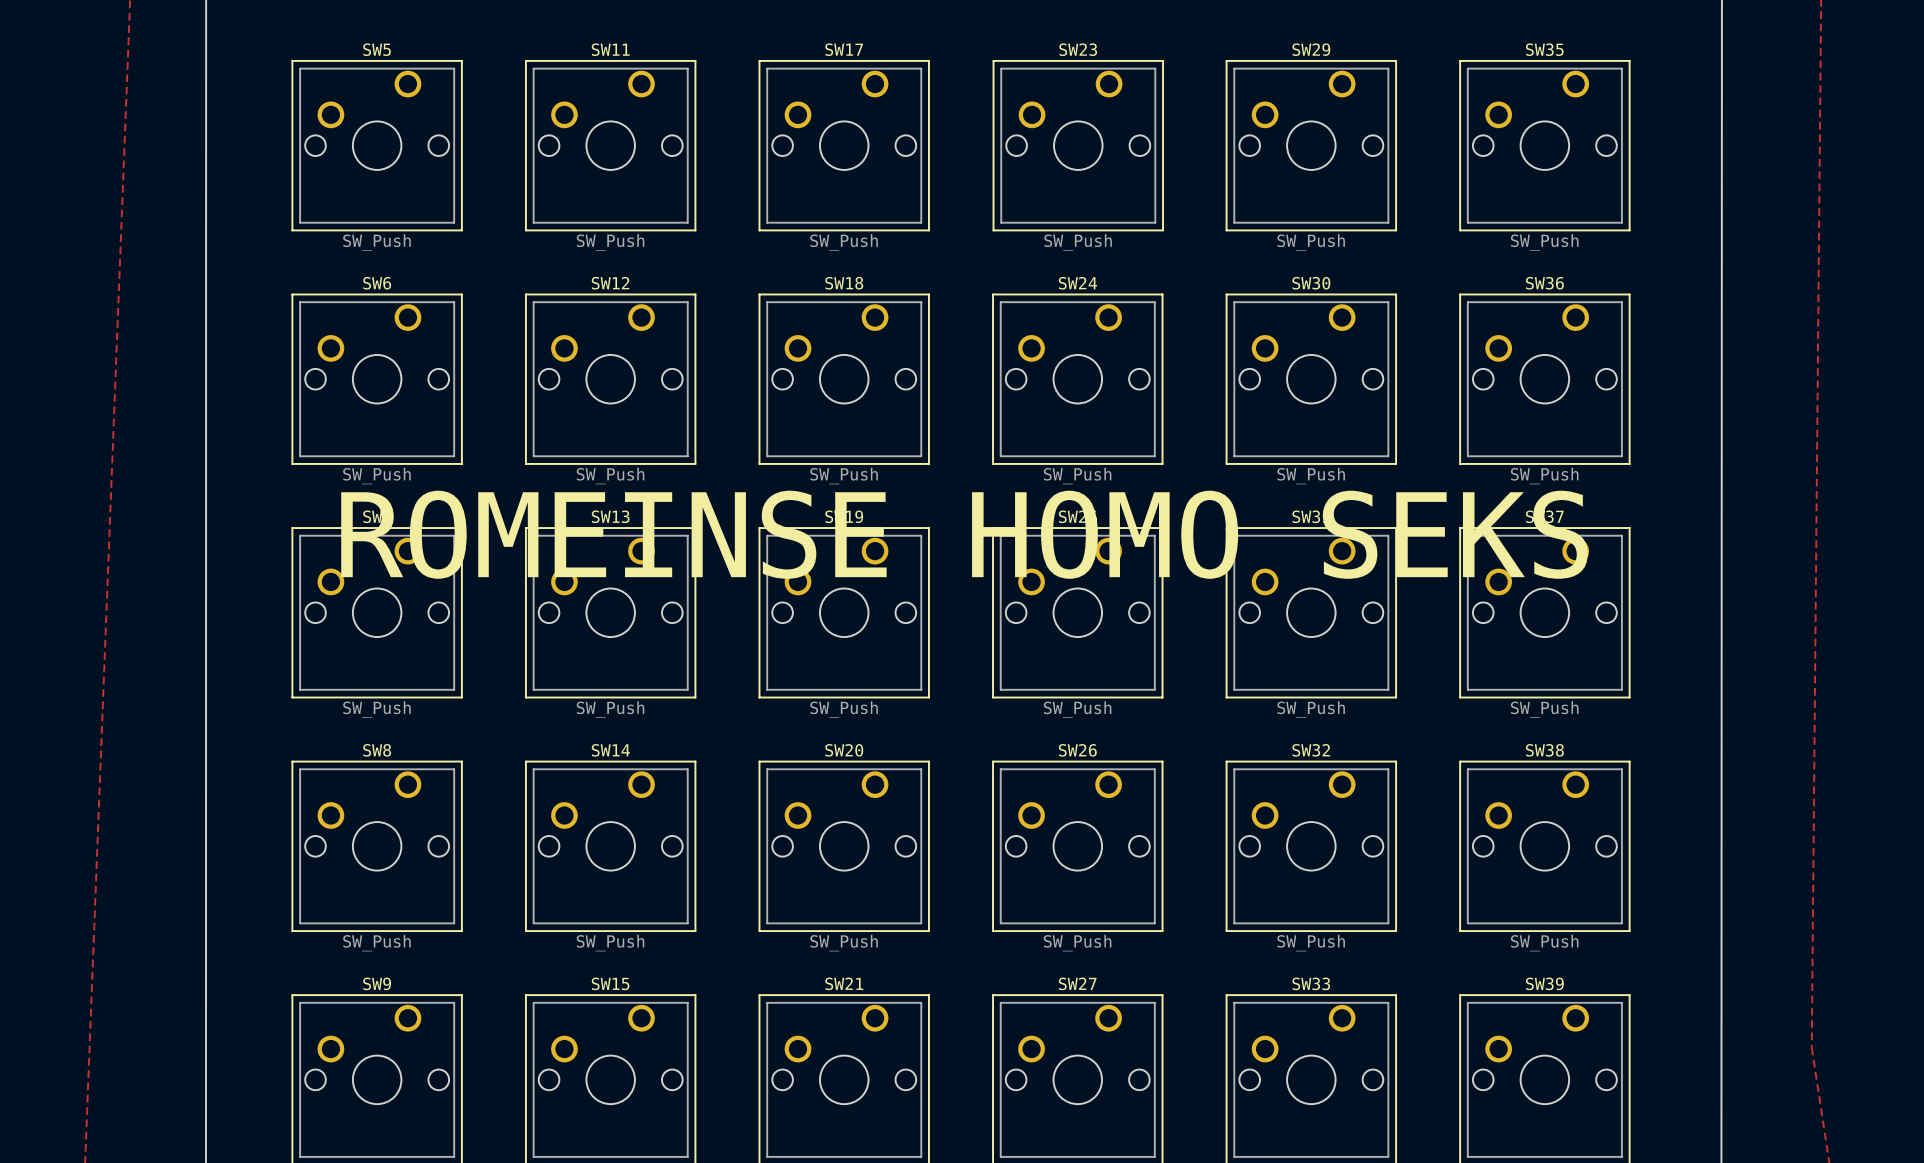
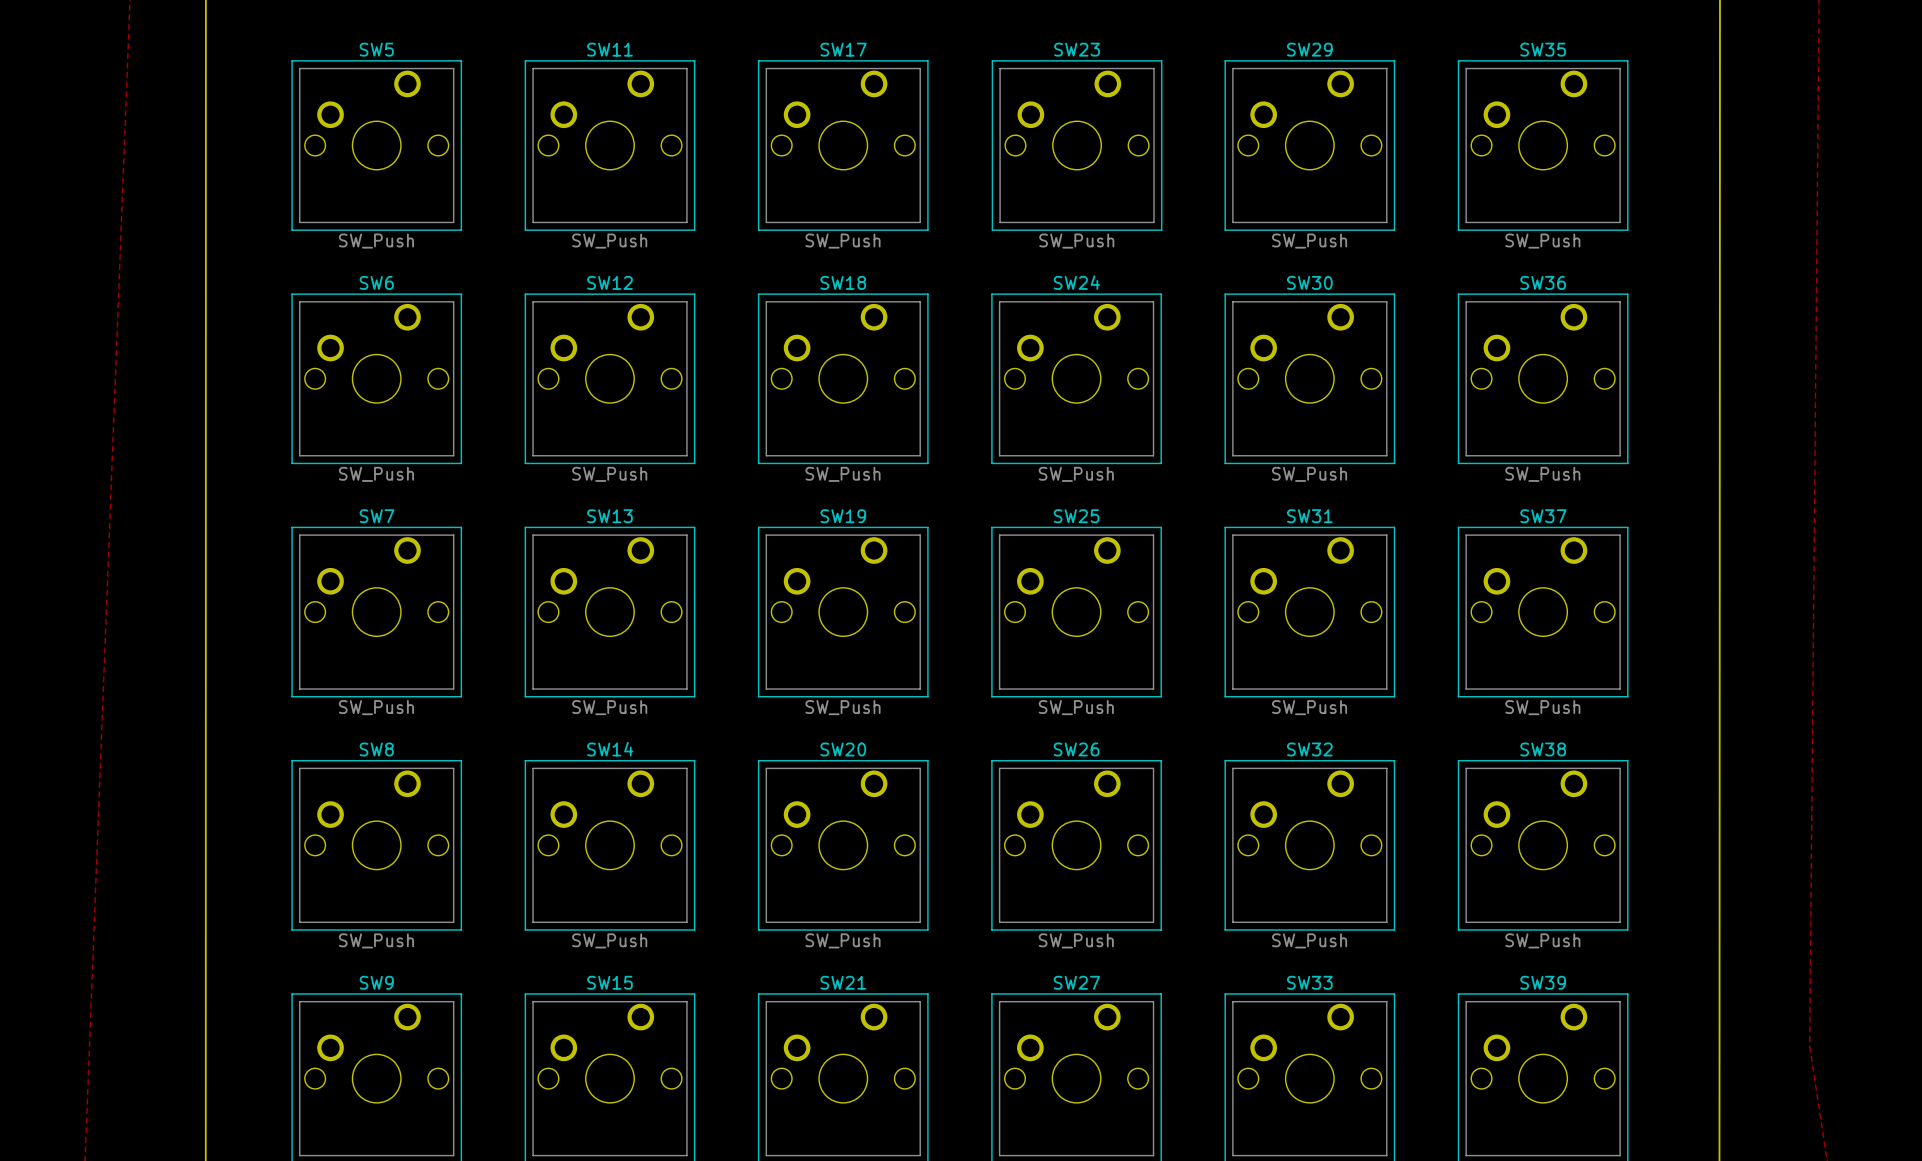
text: ROMEINSE HOMO SEKS (964, 534) -> none

